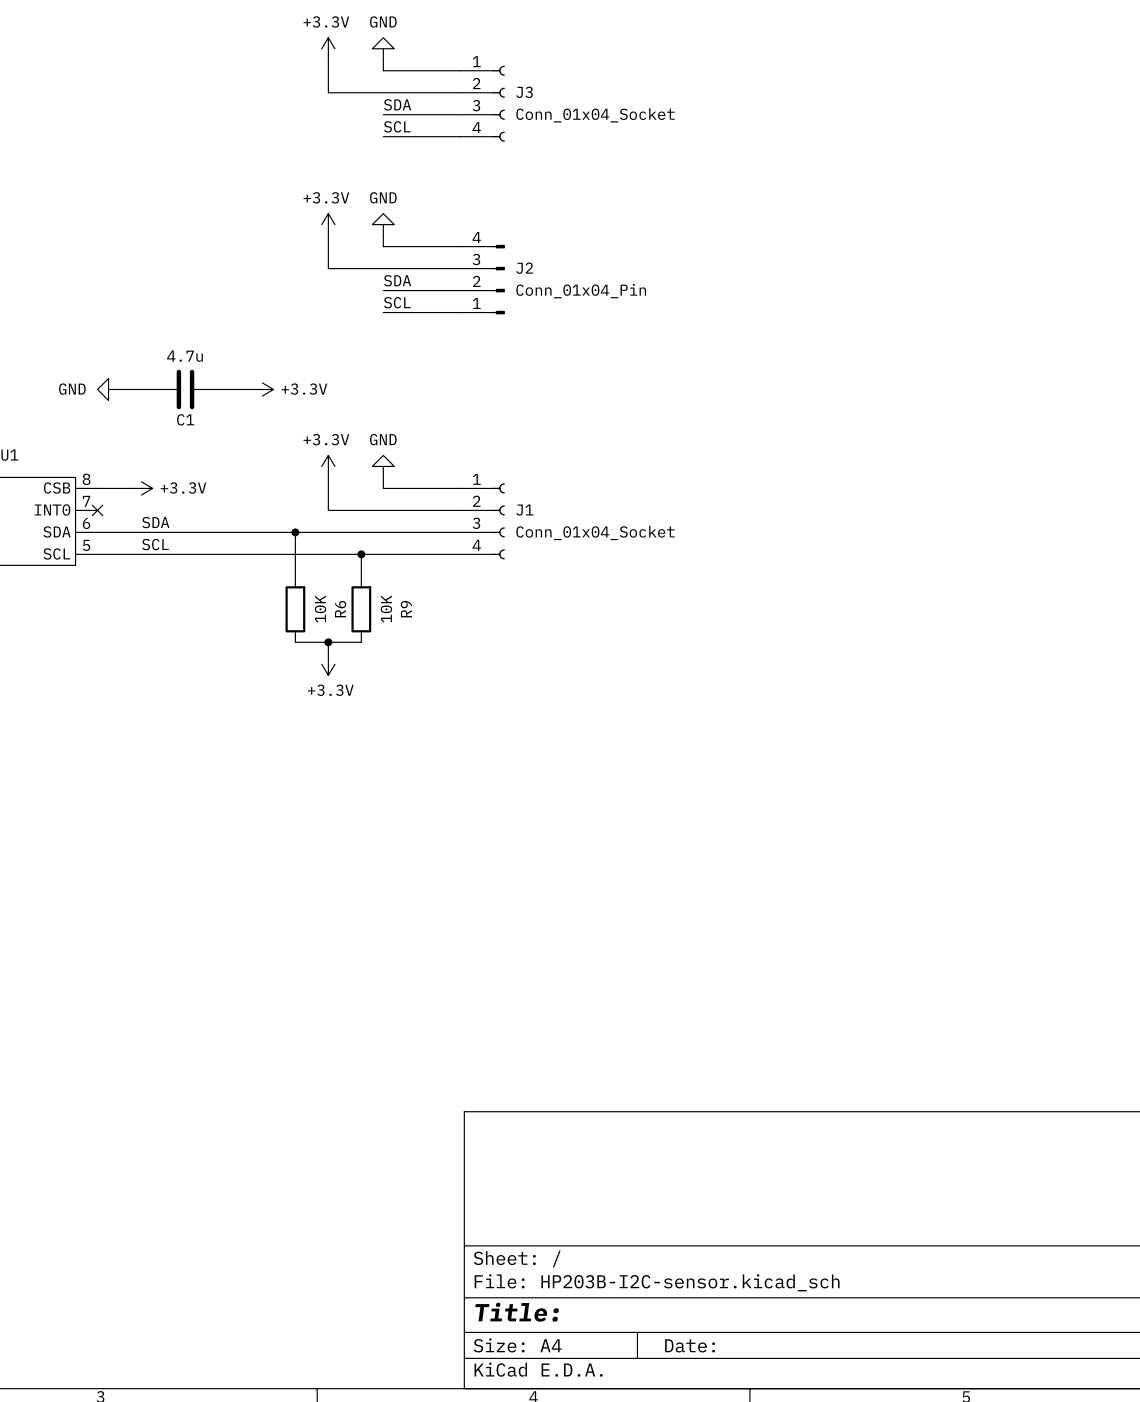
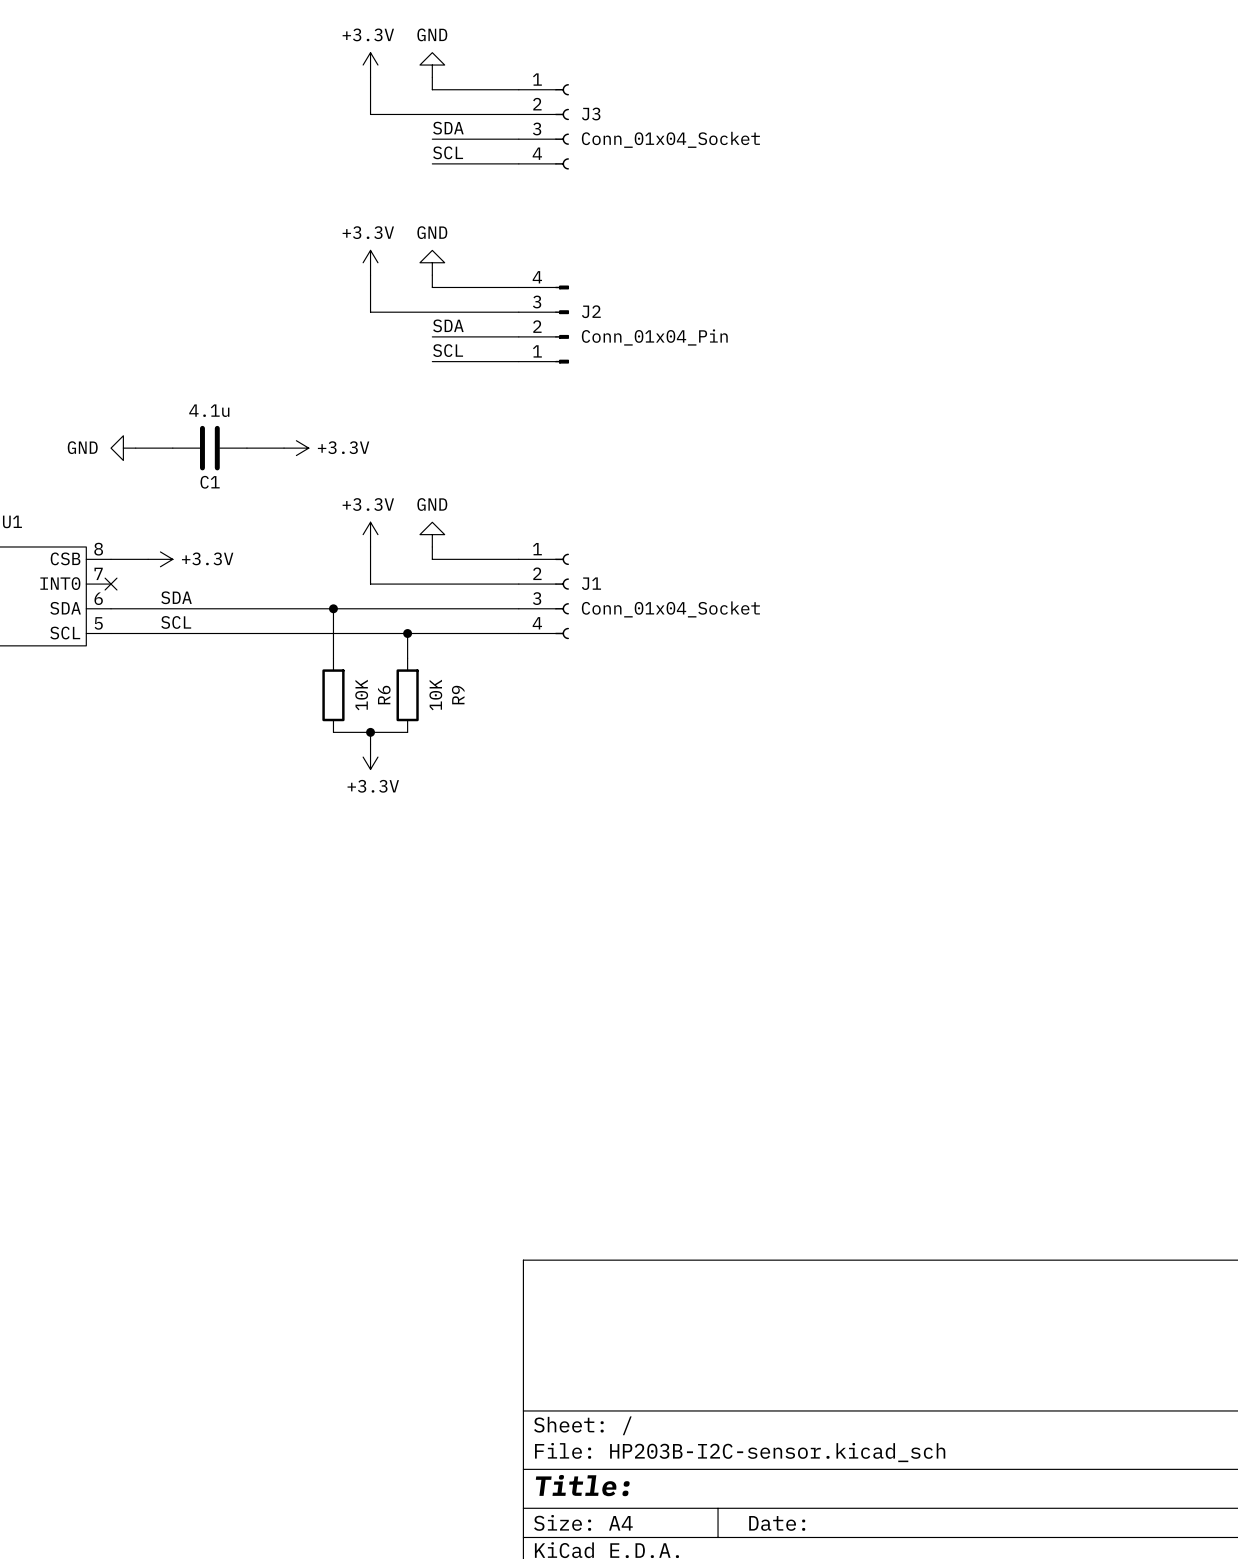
C1 value: 4.7u (184, 356) -> 4.1u (209, 410)

